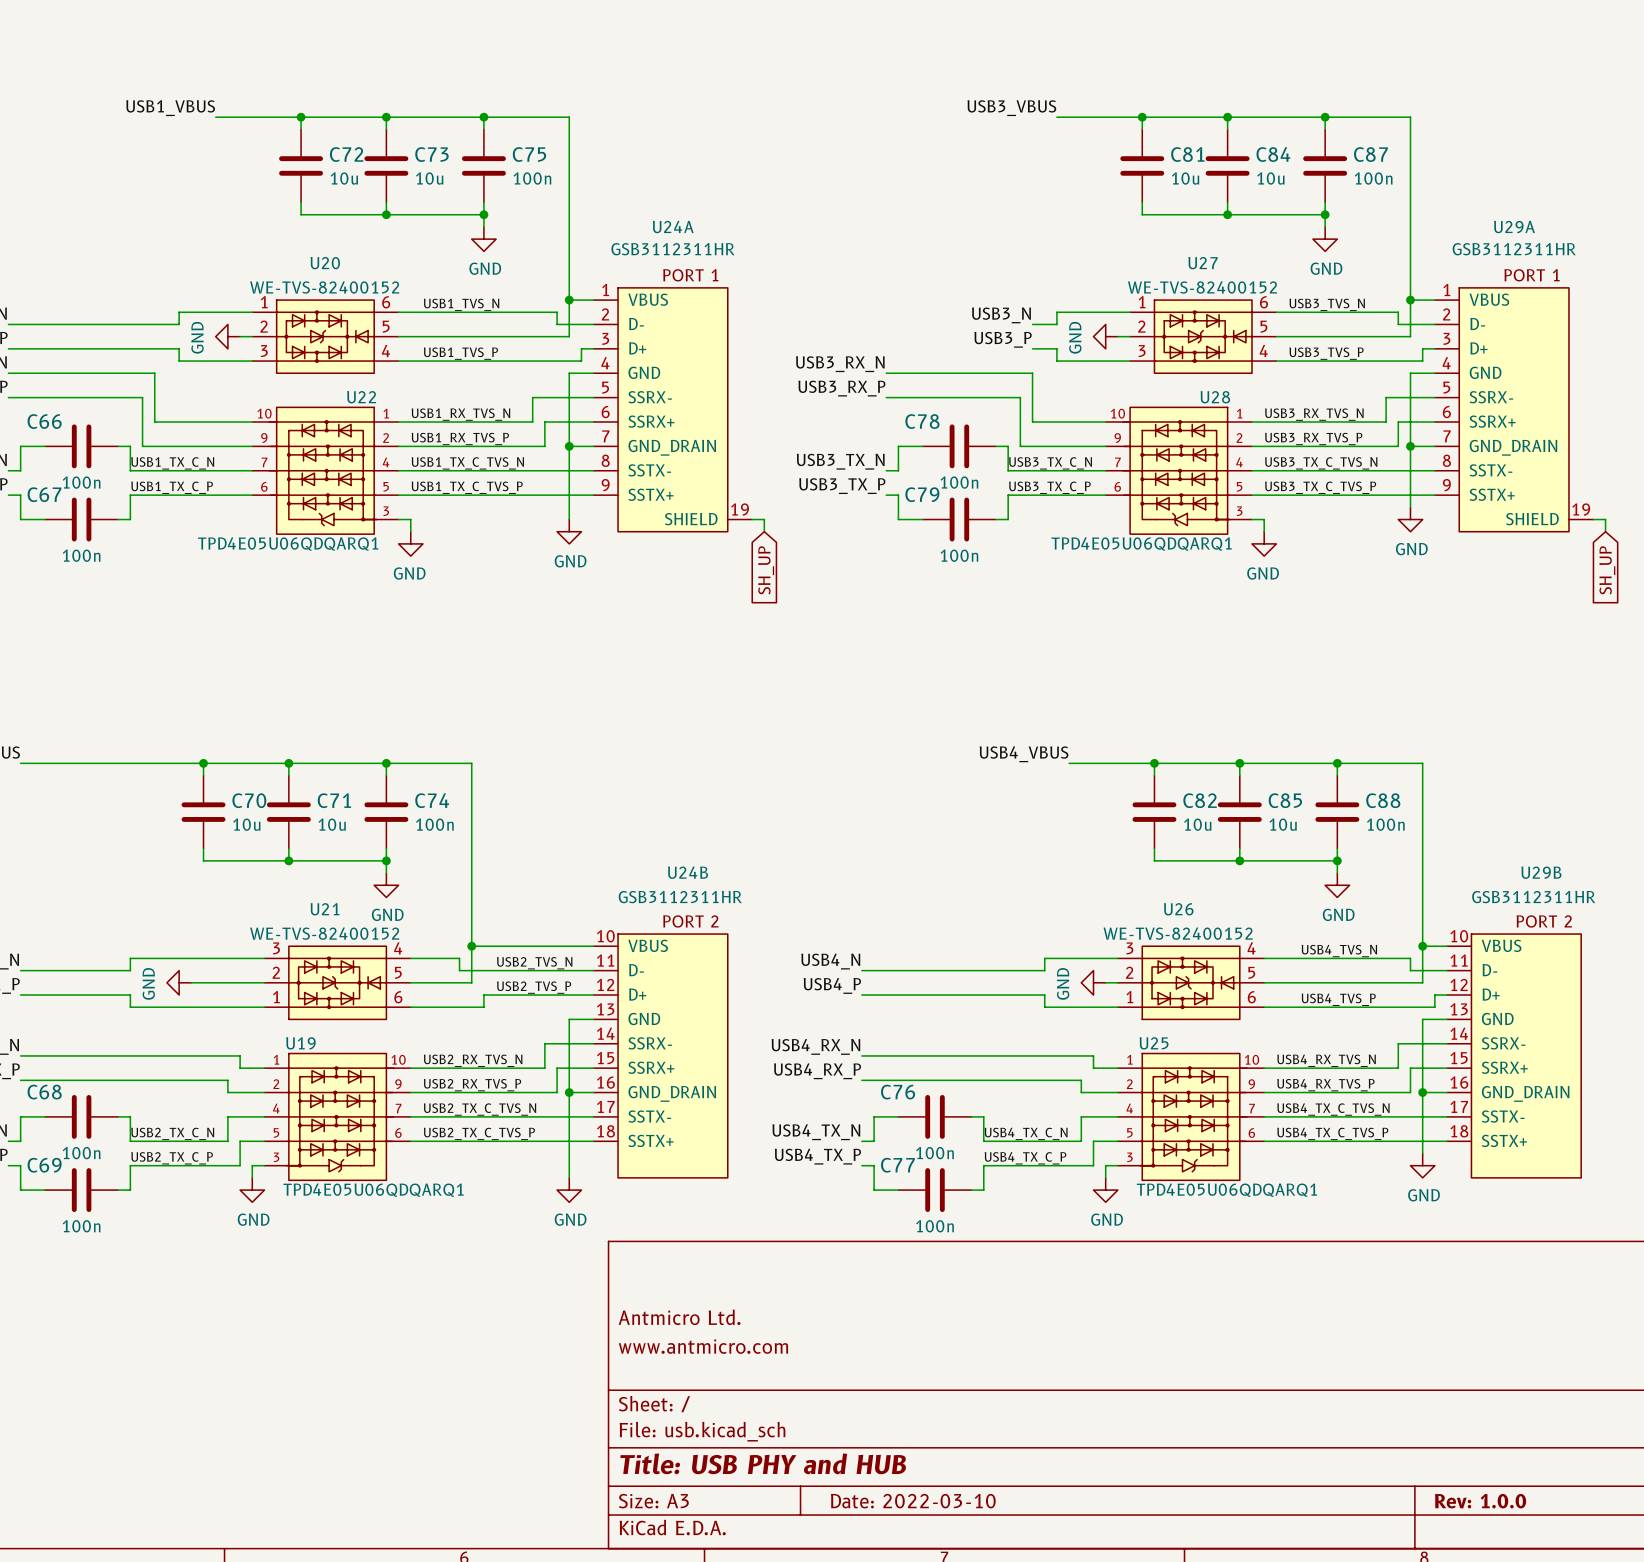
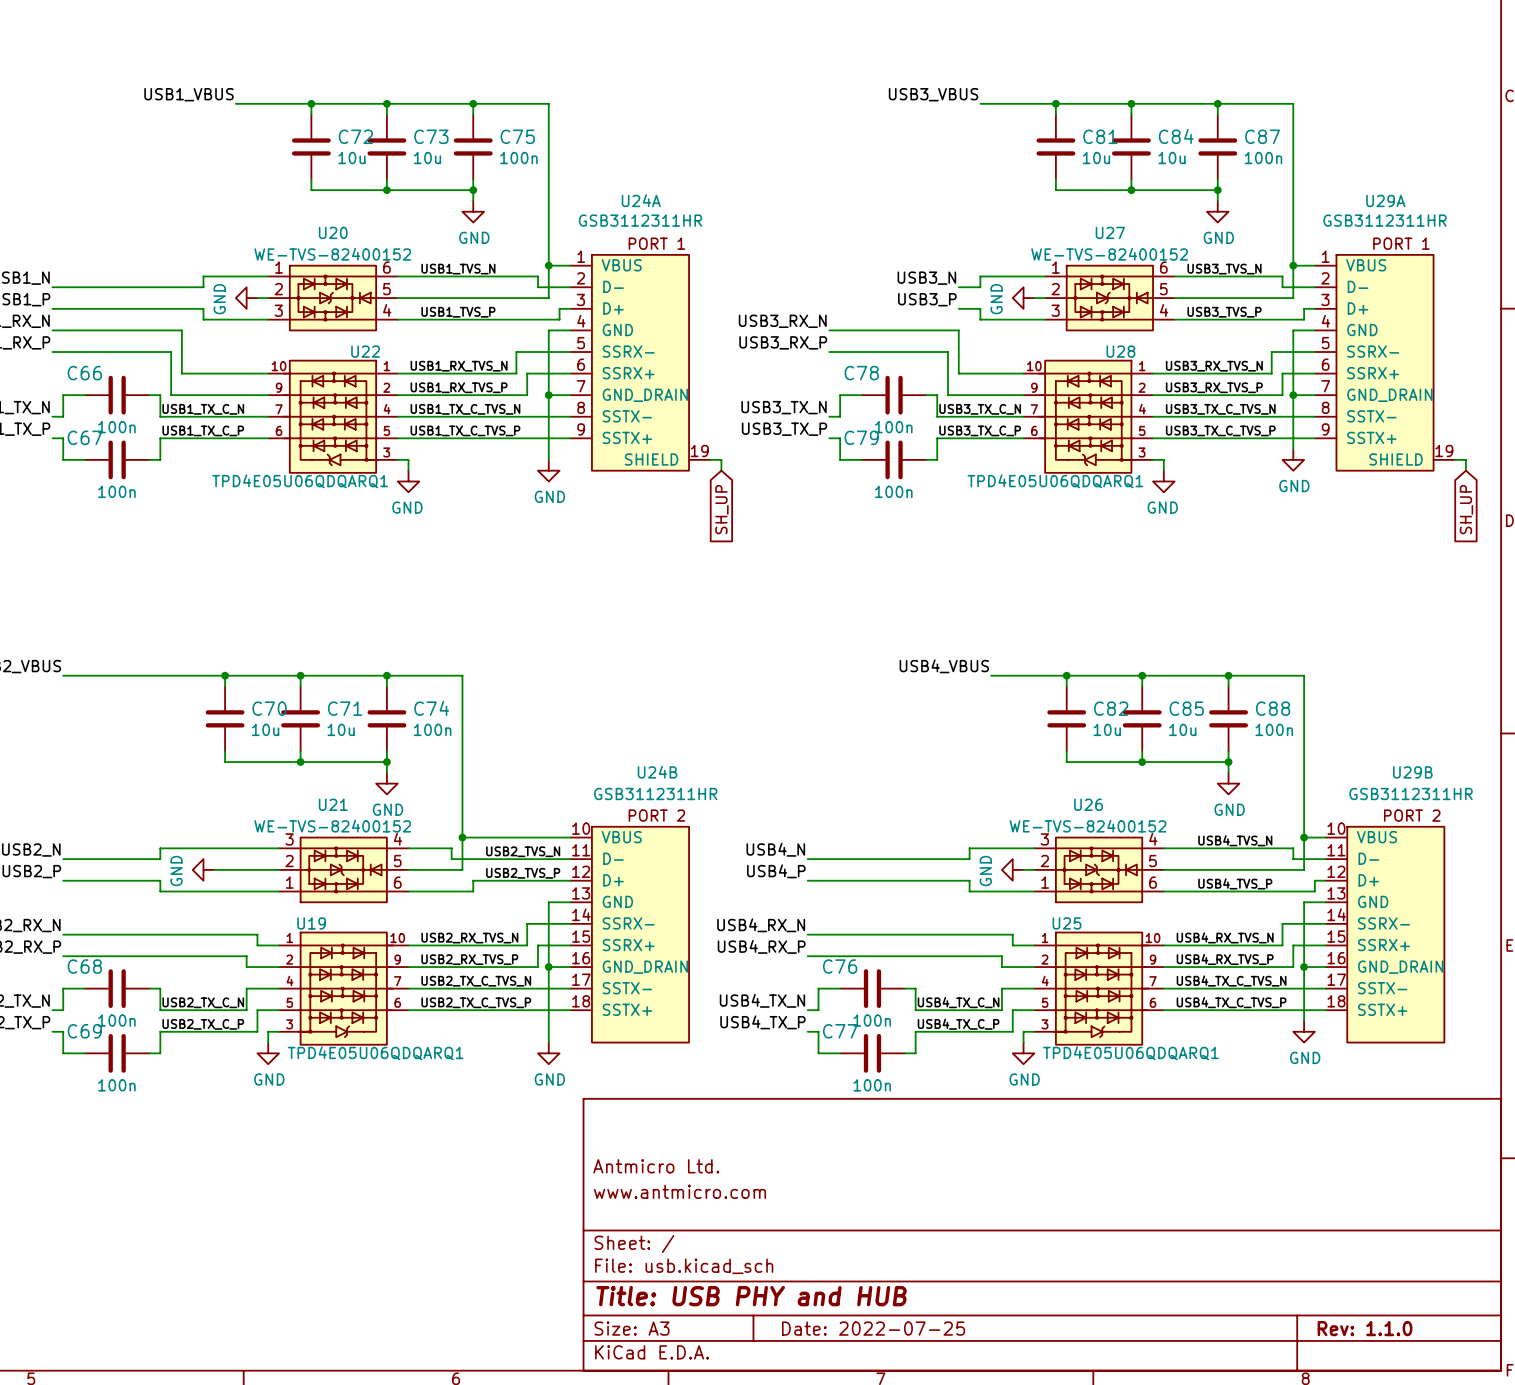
title block: Date: 2022-03-10 (913, 1501) -> Date: 2022-07-25 (873, 1328)
title block: Rev: 1.0.0 (1480, 1501) -> Rev: 1.1.0 (1365, 1328)

